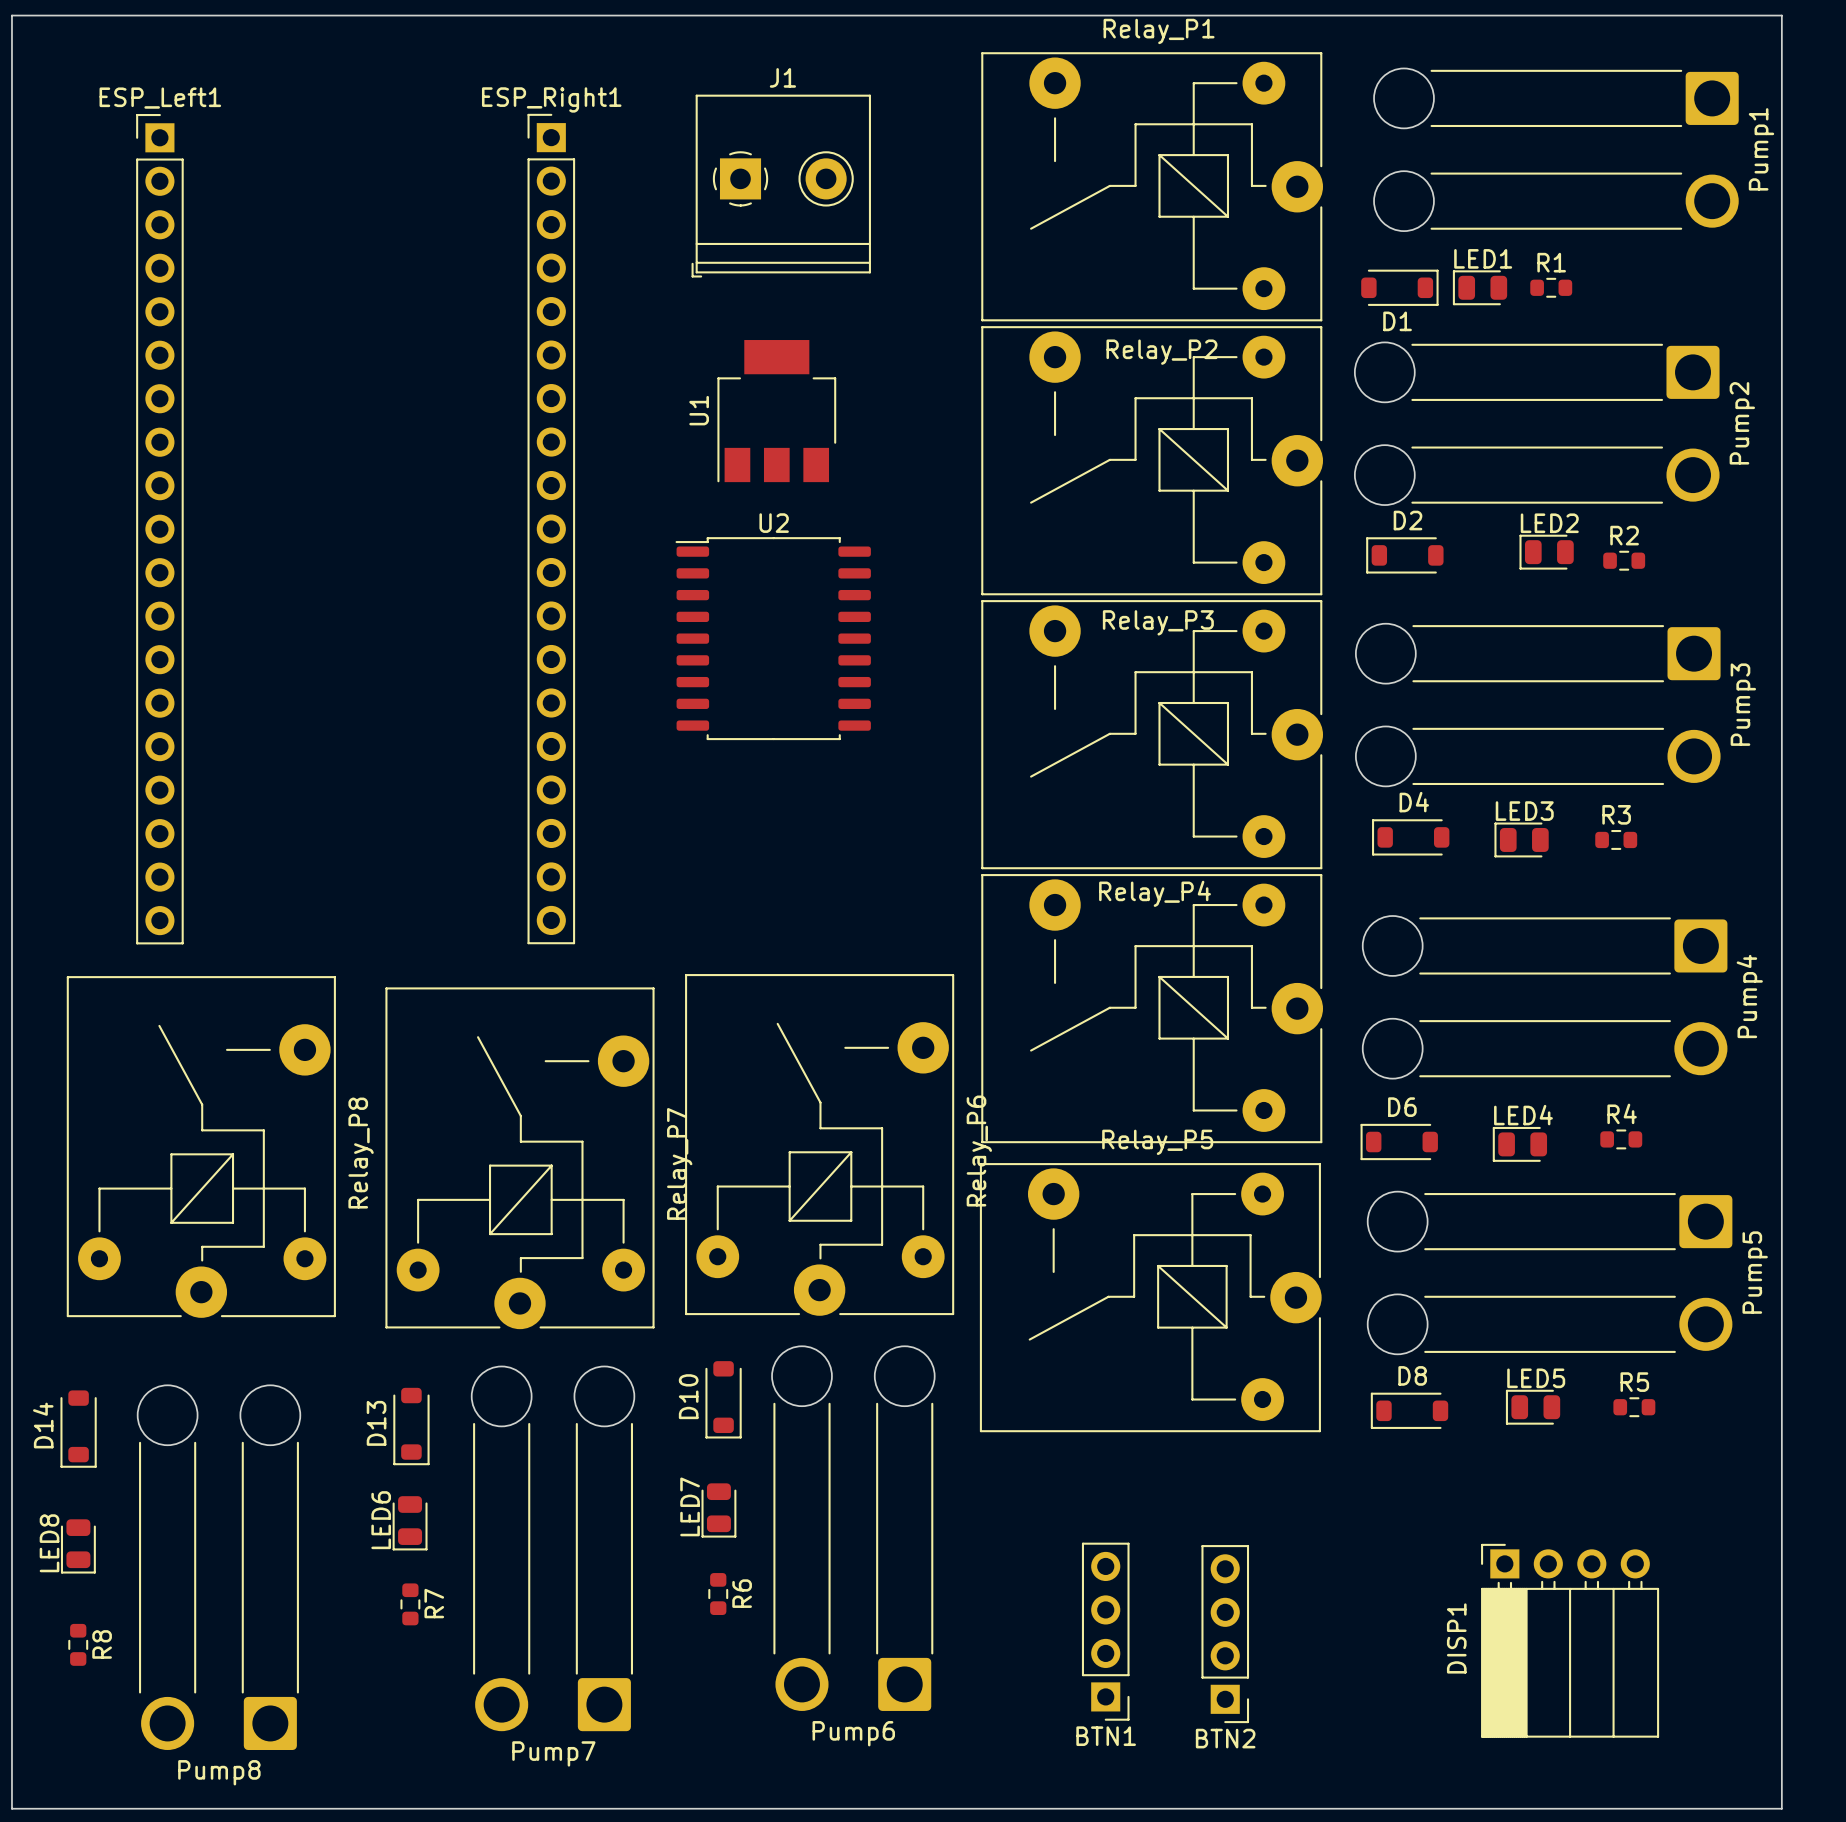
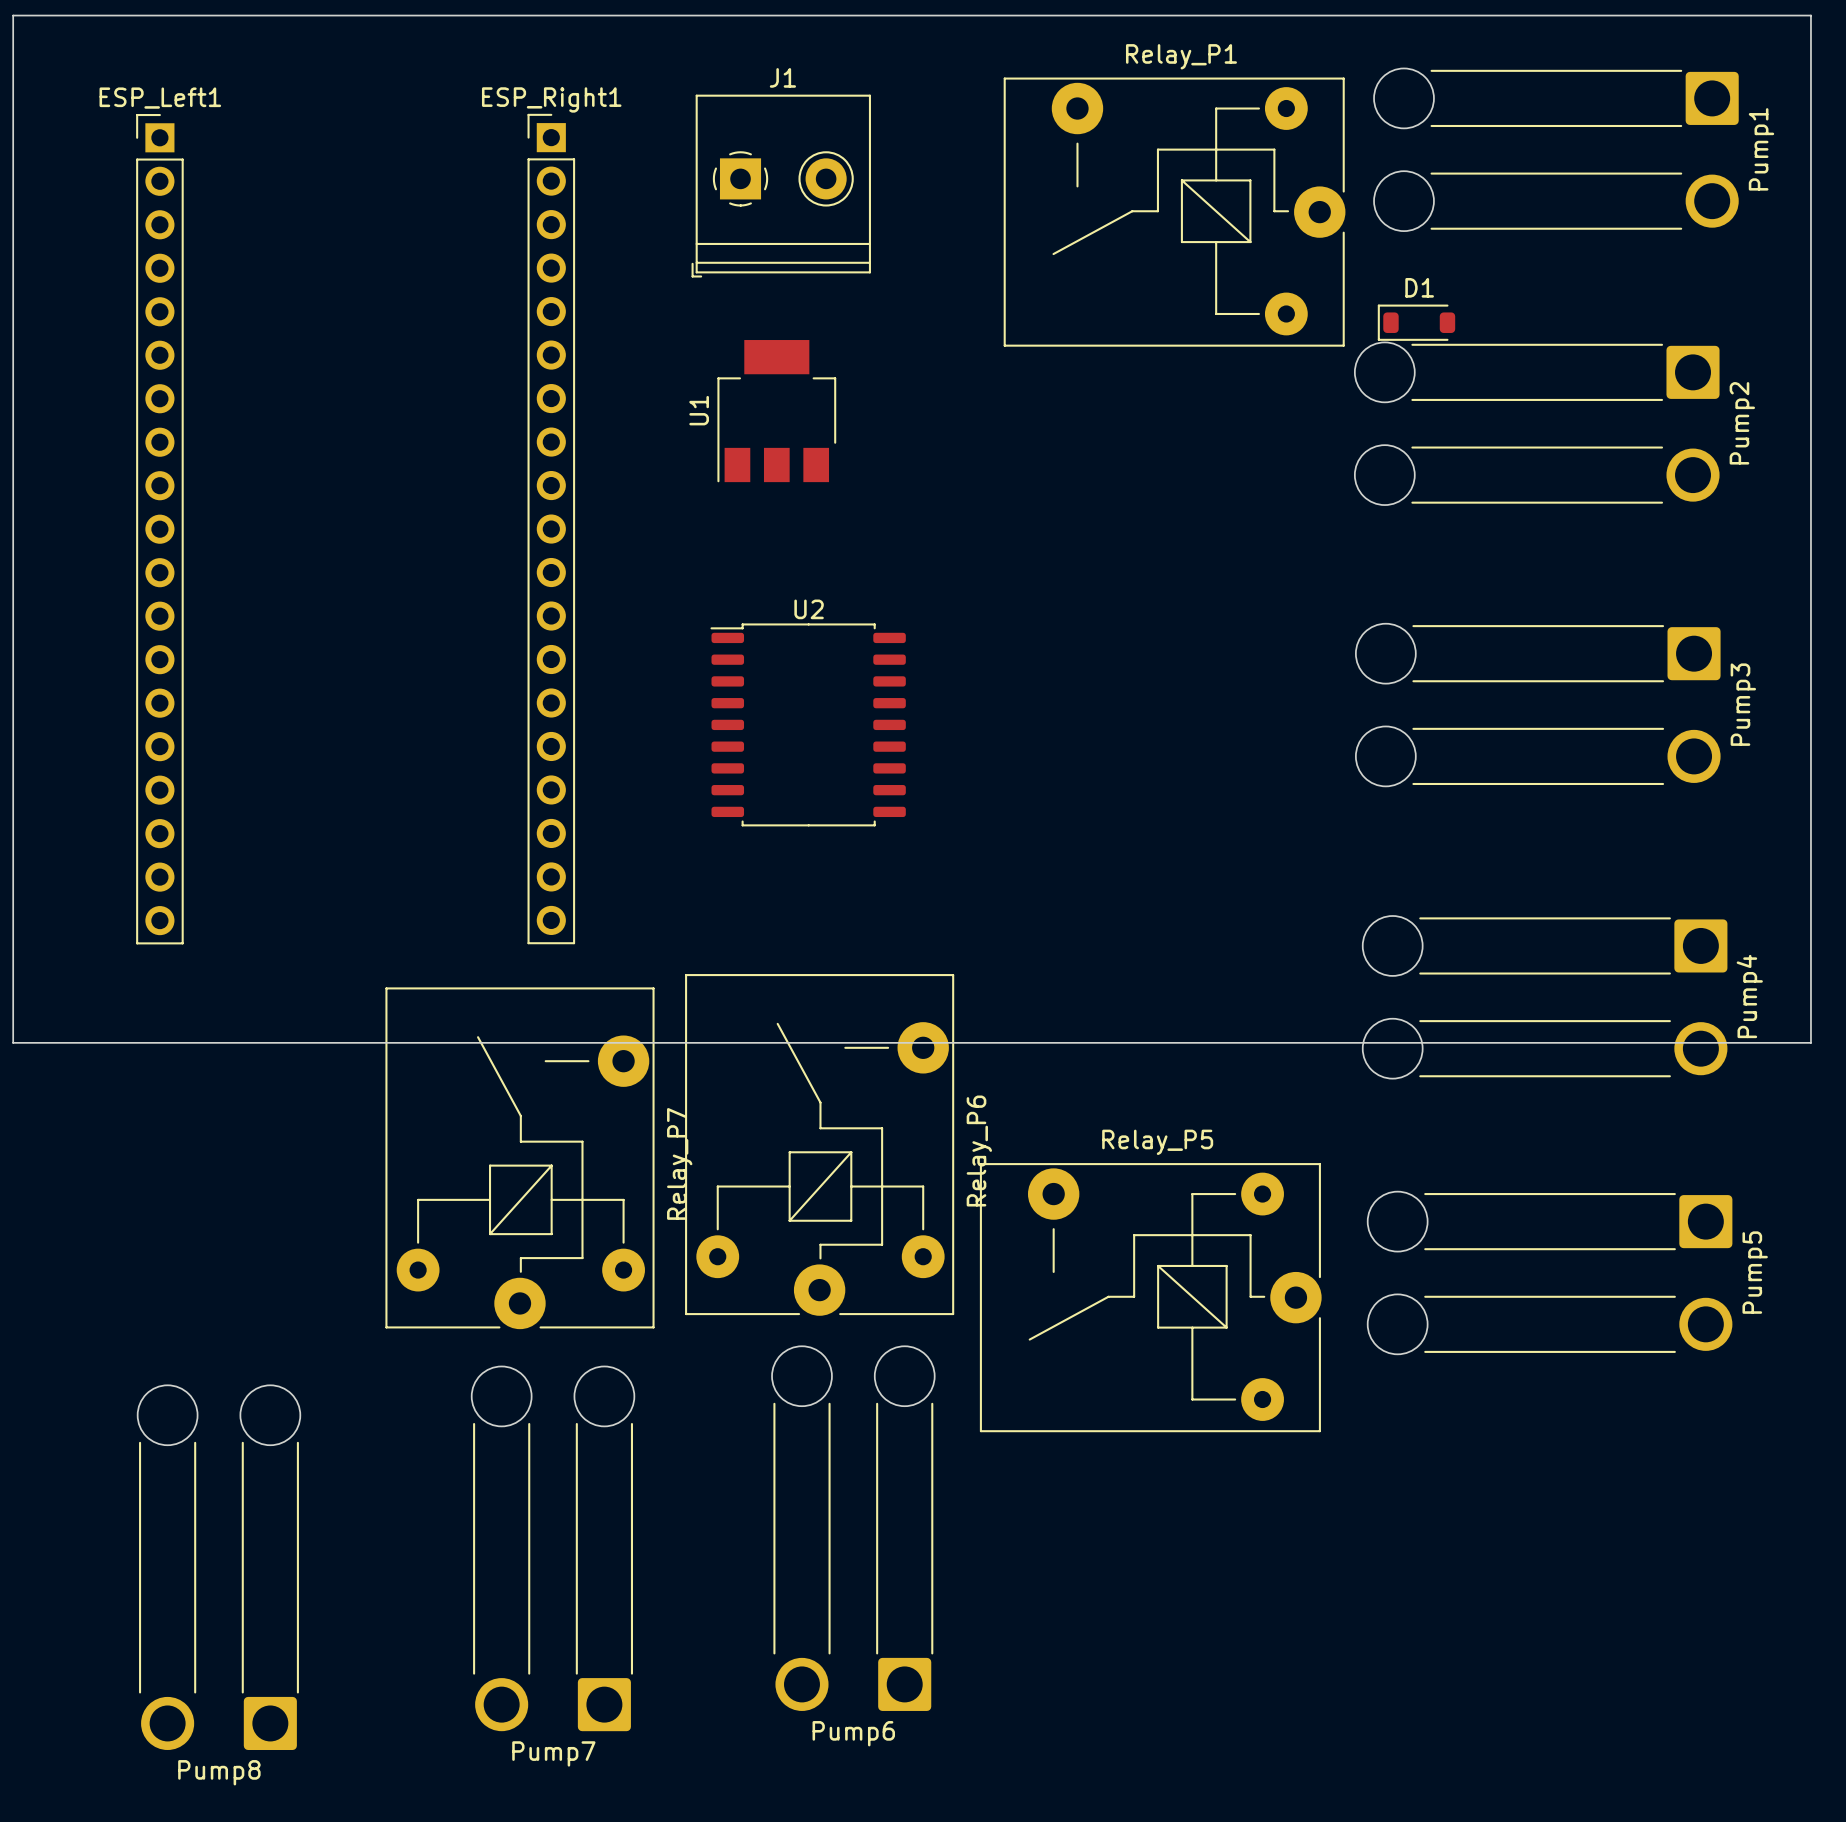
board edge: (13, 15) (11, 1808) (1781, 1808) (1781, 15) -> (13, 15) (13, 1042) (1810, 1042) (1810, 15) (1781, 15)
Relay_P1 position: (1152, 186) -> (1174, 212)
D1 rotation: 0° (1399, 287) -> 180° (1416, 322)
LED1: (1480, 287) -> none
R1: (1551, 287) -> none
Relay_P2: (1152, 460) -> none
LED2: (1546, 552) -> none
D2: (1404, 555) -> none
R2: (1624, 560) -> none
U2 position: (773, 638) -> (808, 724)
Relay_P3: (1152, 734) -> none
D4: (1410, 837) -> none
LED3: (1521, 839) -> none
R3: (1616, 839) -> none
Relay_P4: (1152, 1008) -> none
R4: (1621, 1139) -> none
D6: (1399, 1142) -> none
LED4: (1519, 1144) -> none
Relay_P8: (201, 1146) -> none
D10: (723, 1399) -> none
LED5: (1533, 1407) -> none
R5: (1634, 1407) -> none
D8: (1409, 1410) -> none
D13: (411, 1426) -> none
D14: (78, 1429) -> none
LED7: (718, 1510) -> none
LED6: (410, 1523) -> none
LED8: (78, 1546) -> none
R6: (718, 1594) -> none
R7: (410, 1604) -> none
BTN1: (1105, 1631) -> none
BTN2: (1225, 1634) -> none
DISP1: (1570, 1640) -> none
R8: (78, 1644) -> none

